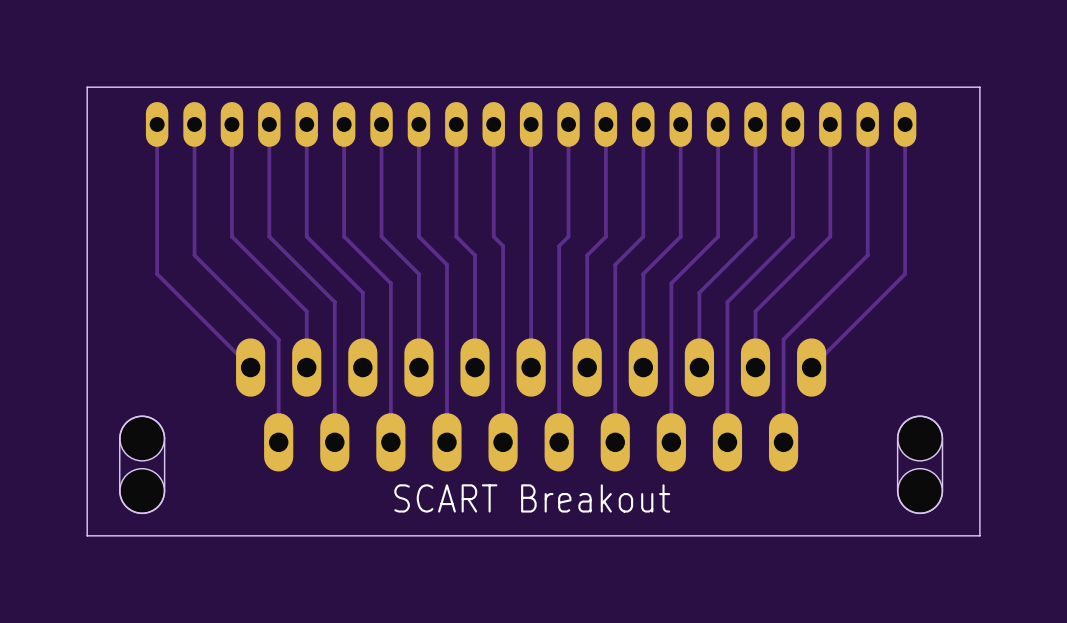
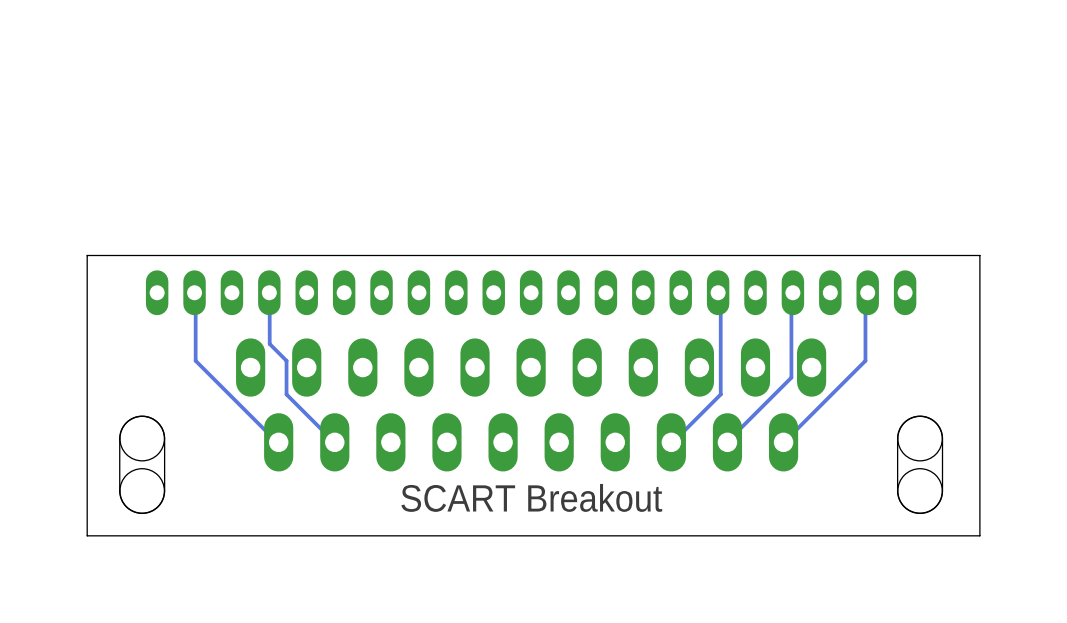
track: (157, 124) (157, 274) (250, 367) -> none
track: (194, 124) (194, 255) (278, 339) (278, 442) -> (194, 292) (195, 360) (278, 442)
track: (231, 124) (231, 236) (306, 311) (306, 367) -> none
track: (269, 124) (269, 236) (334, 302) (334, 442) -> (269, 292) (269, 343) (286, 360) (286, 394) (334, 442)
track: (306, 124) (306, 236) (362, 292) (362, 367) -> none
track: (344, 124) (344, 236) (390, 283) (390, 442) -> none
track: (381, 124) (381, 236) (418, 274) (418, 367) -> none
track: (418, 124) (418, 236) (446, 264) (446, 442) -> none
track: (456, 124) (456, 236) (475, 255) (475, 367) -> none
track: (493, 124) (493, 236) (503, 246) (503, 442) -> none
track: (531, 124) (531, 367) -> none
part: (531, 124) -> none
track: (568, 124) (568, 236) (559, 246) (559, 442) -> none
track: (605, 124) (605, 236) (587, 255) (587, 367) -> none
track: (643, 124) (643, 236) (615, 264) (615, 442) -> none
track: (680, 124) (680, 236) (643, 274) (643, 367) -> none
track: (718, 124) (718, 236) (671, 283) (671, 442) -> (718, 292) (720, 293) (720, 394) (671, 442)
track: (755, 124) (755, 236) (699, 292) (699, 367) -> none
track: (792, 124) (792, 236) (727, 302) (727, 441) -> (792, 292) (791, 377) (727, 441)
track: (830, 124) (830, 236) (755, 311) (755, 367) -> none
track: (867, 124) (867, 255) (783, 339) (783, 442) -> (867, 292) (865, 293) (865, 360) (783, 442)
track: (905, 124) (905, 274) (811, 367) -> none
board edge: (979, 255) (979, 87) (87, 87) (87, 255) -> (979, 255) (87, 255)
part: none -> (306, 292)
part: none -> (699, 292)

